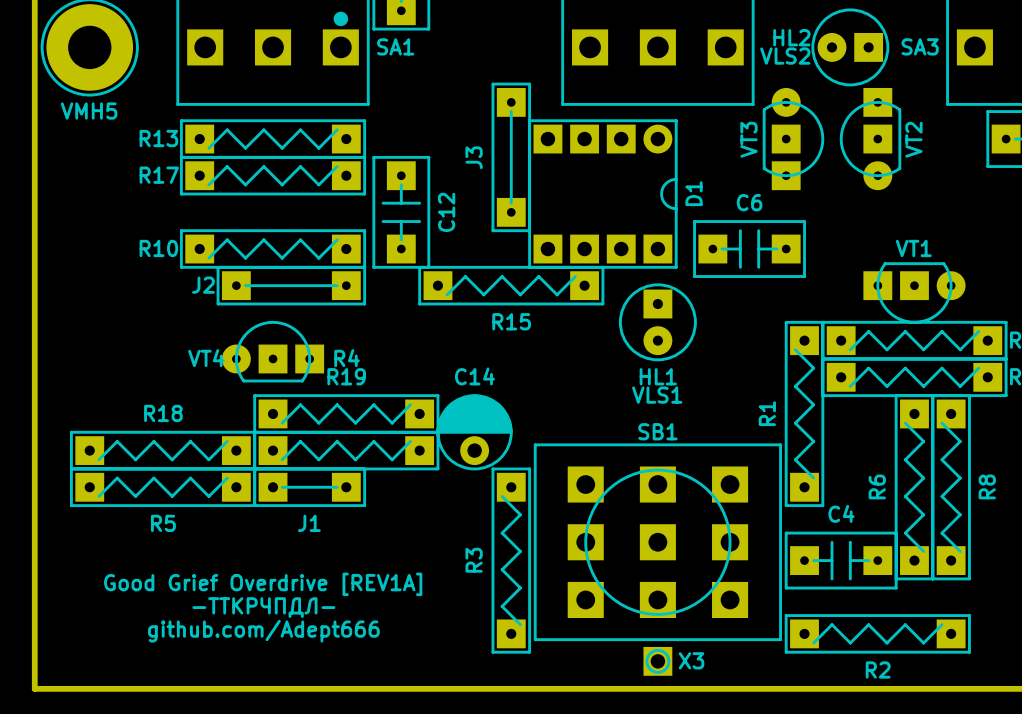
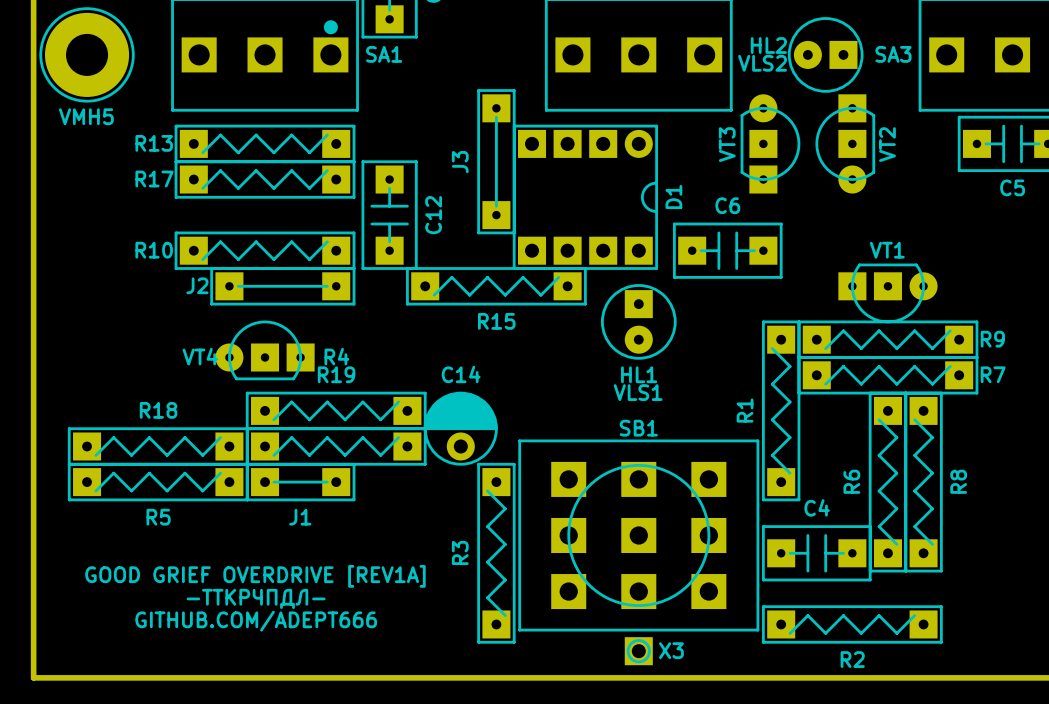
text: Good Grief Overdrive [REV1A] (263, 584) -> GOOD GRIEF OVERDRIVE [REV1A] (255, 576)
text: github.com/Adept666 (263, 631) -> GITHUB.COM/ADEPT666 (256, 621)

